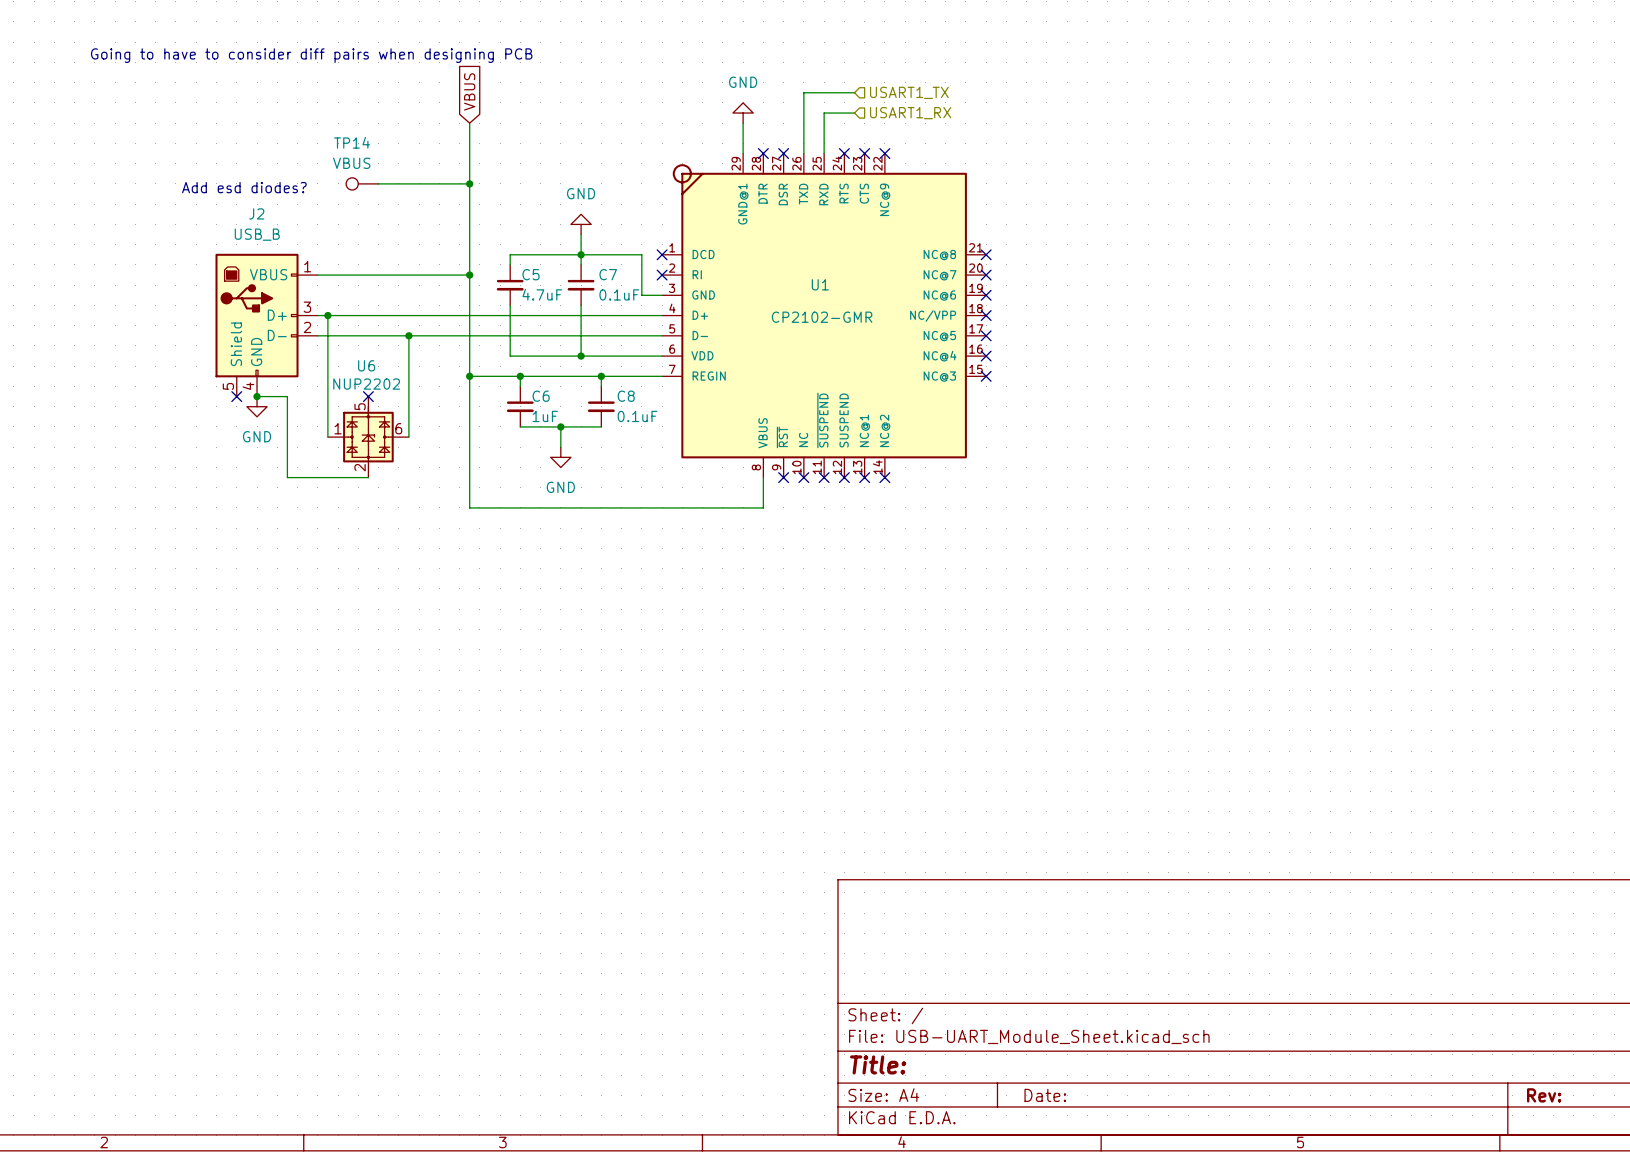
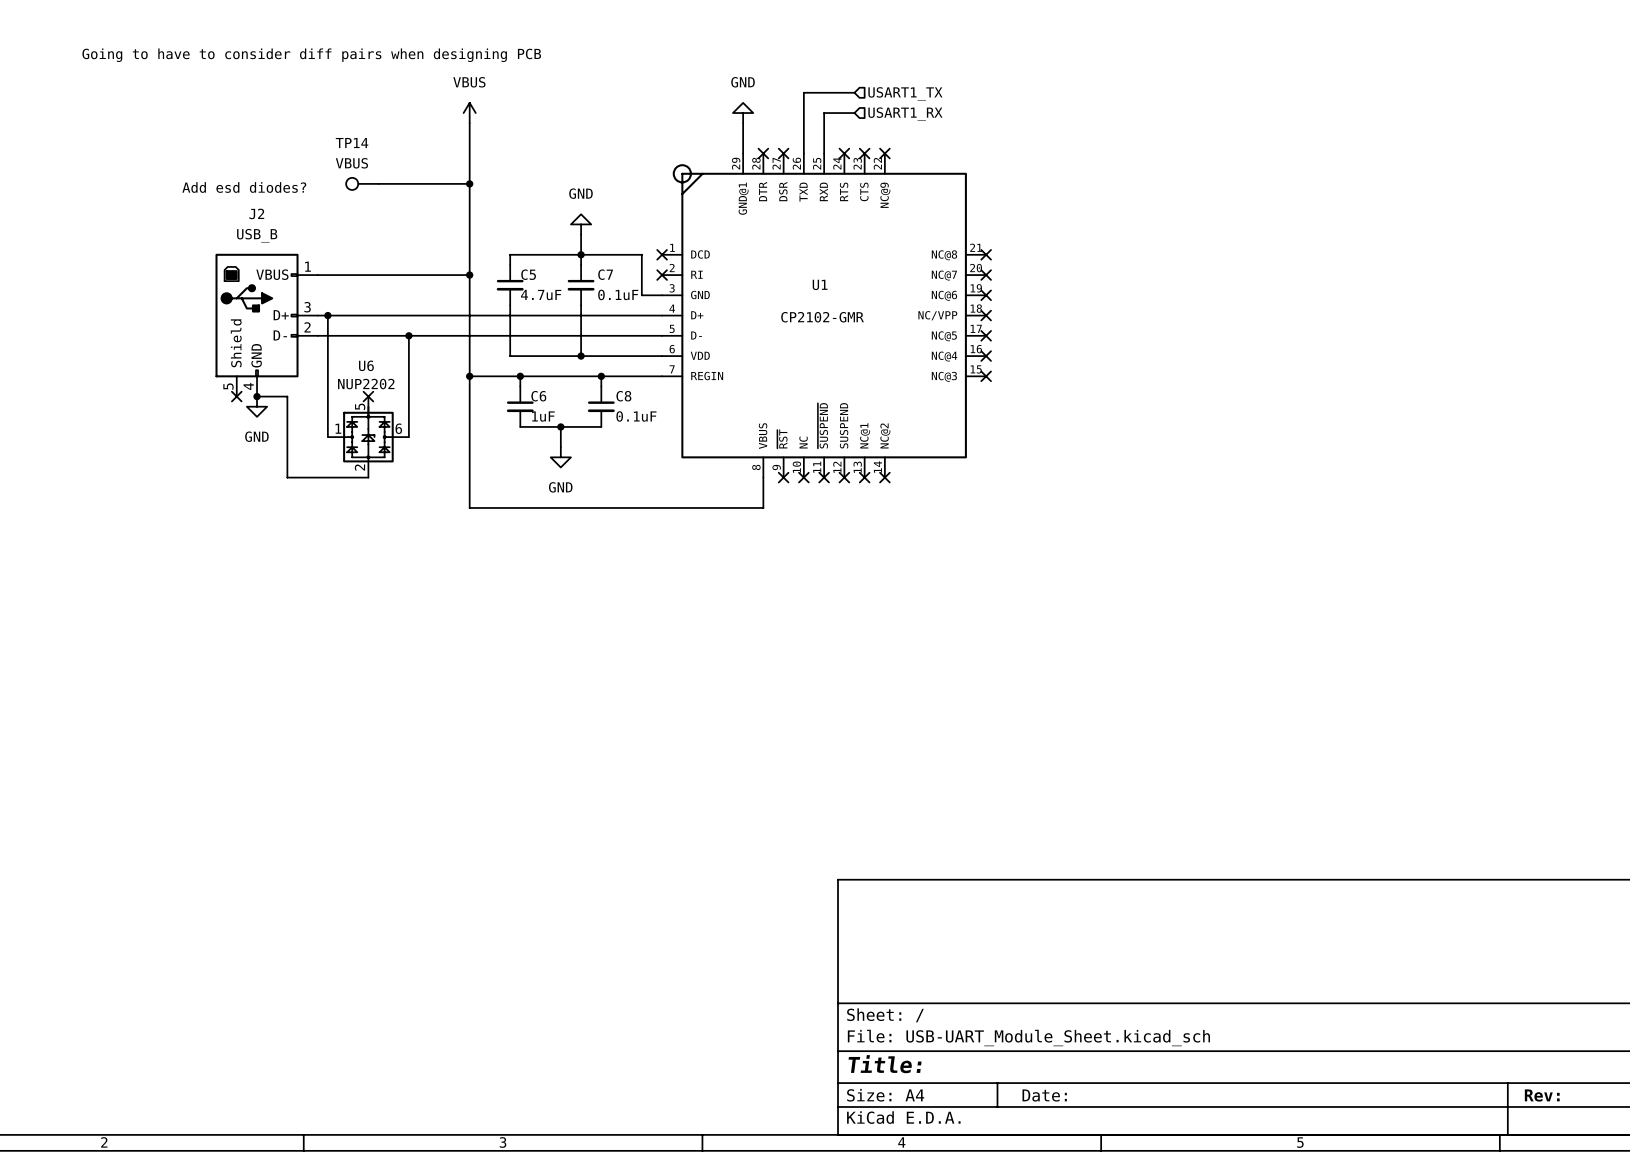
global label: VBUS (469, 91) -> none
power symbol: none -> VBUS (469, 113)

